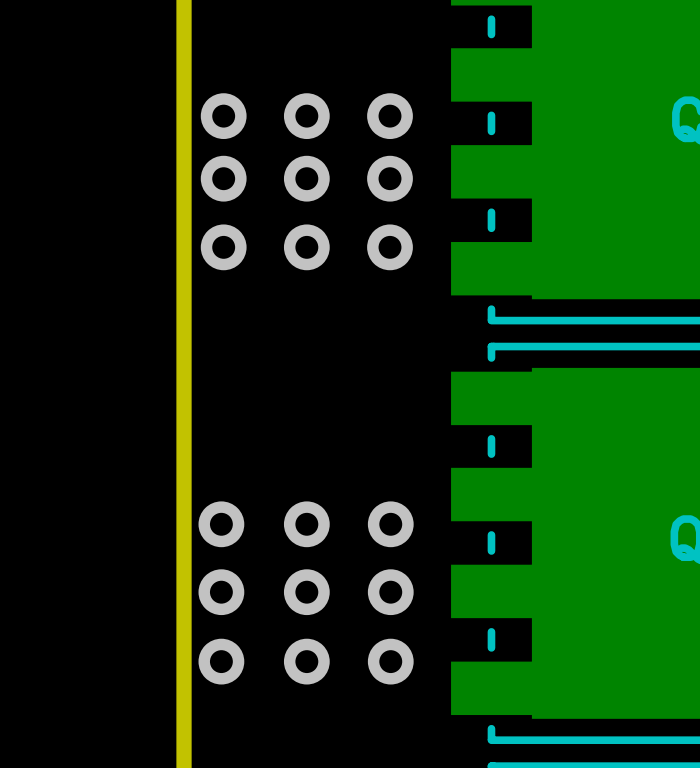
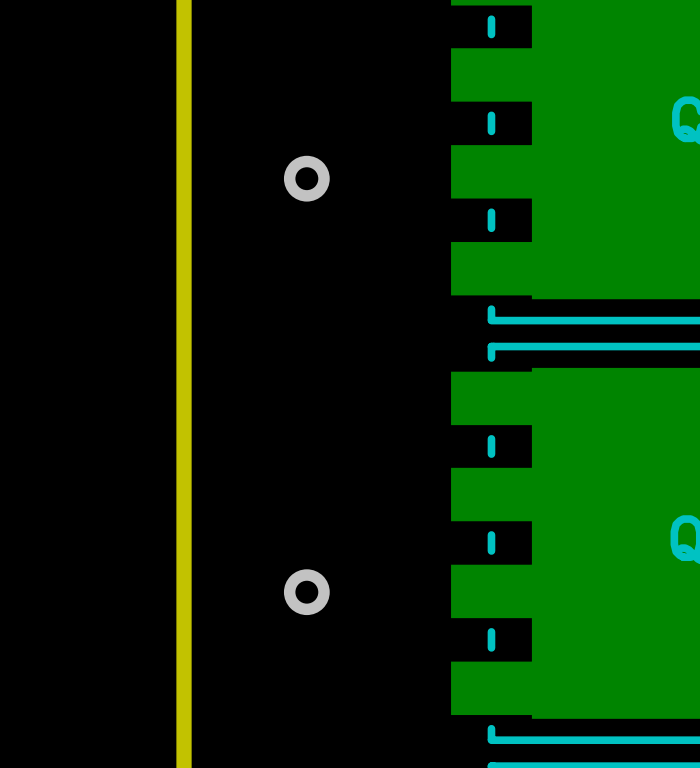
via: (223, 116) -> none
via: (306, 116) -> none
via: (390, 116) -> none
via: (223, 178) -> none
via: (390, 178) -> none
via: (223, 247) -> none
via: (306, 247) -> none
via: (390, 247) -> none
via: (221, 524) -> none
via: (306, 524) -> none
via: (390, 524) -> none
via: (221, 592) -> none
via: (390, 592) -> none
via: (221, 661) -> none
via: (306, 661) -> none
via: (390, 661) -> none

